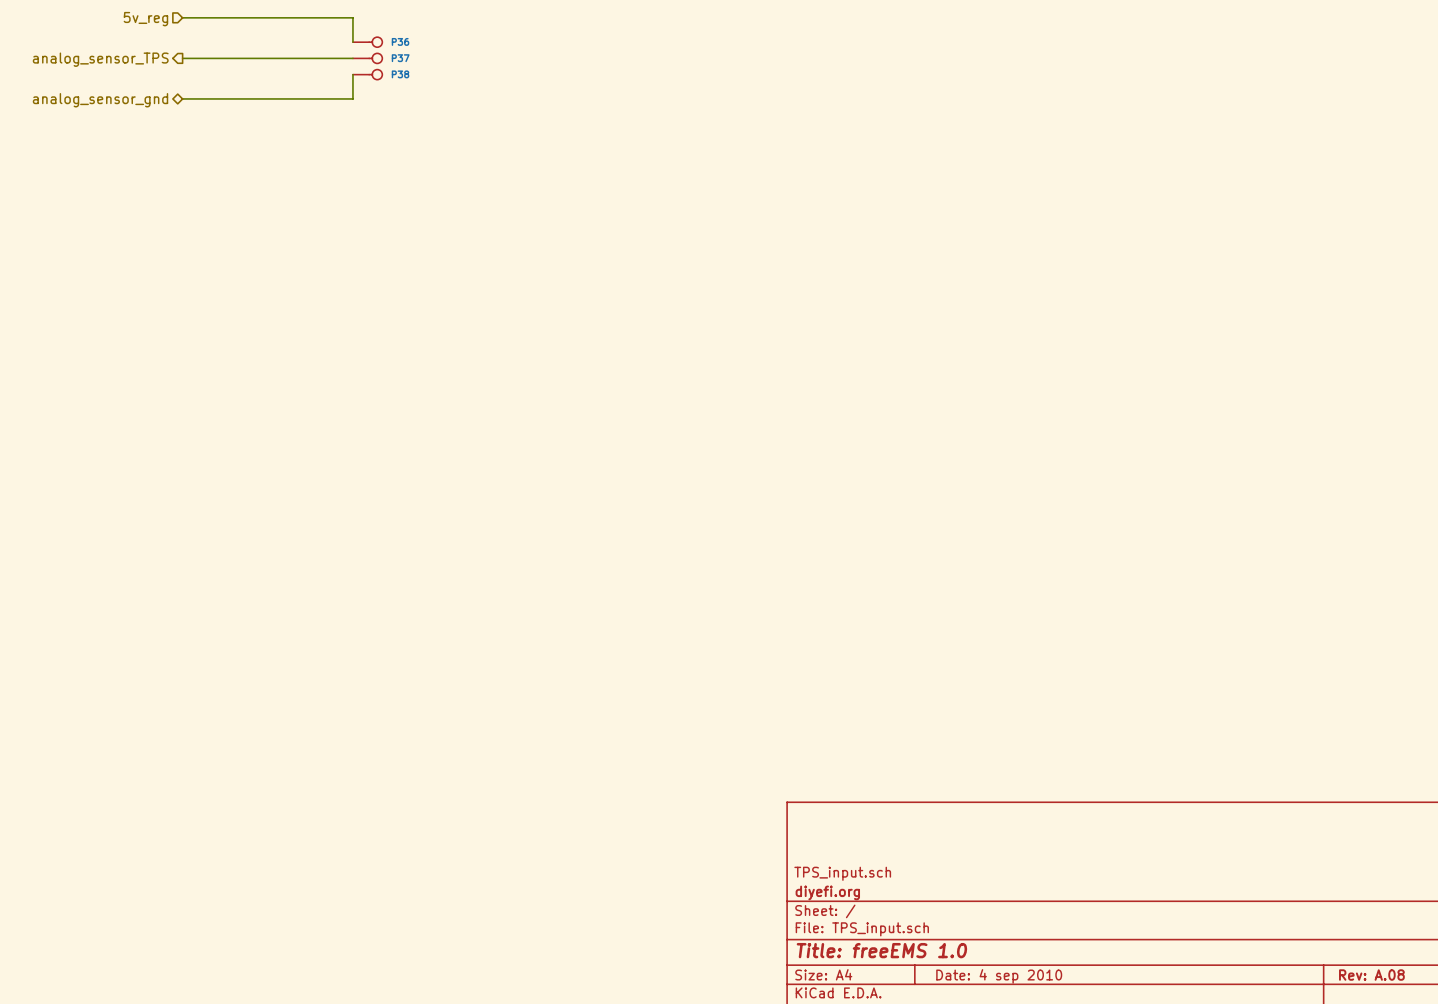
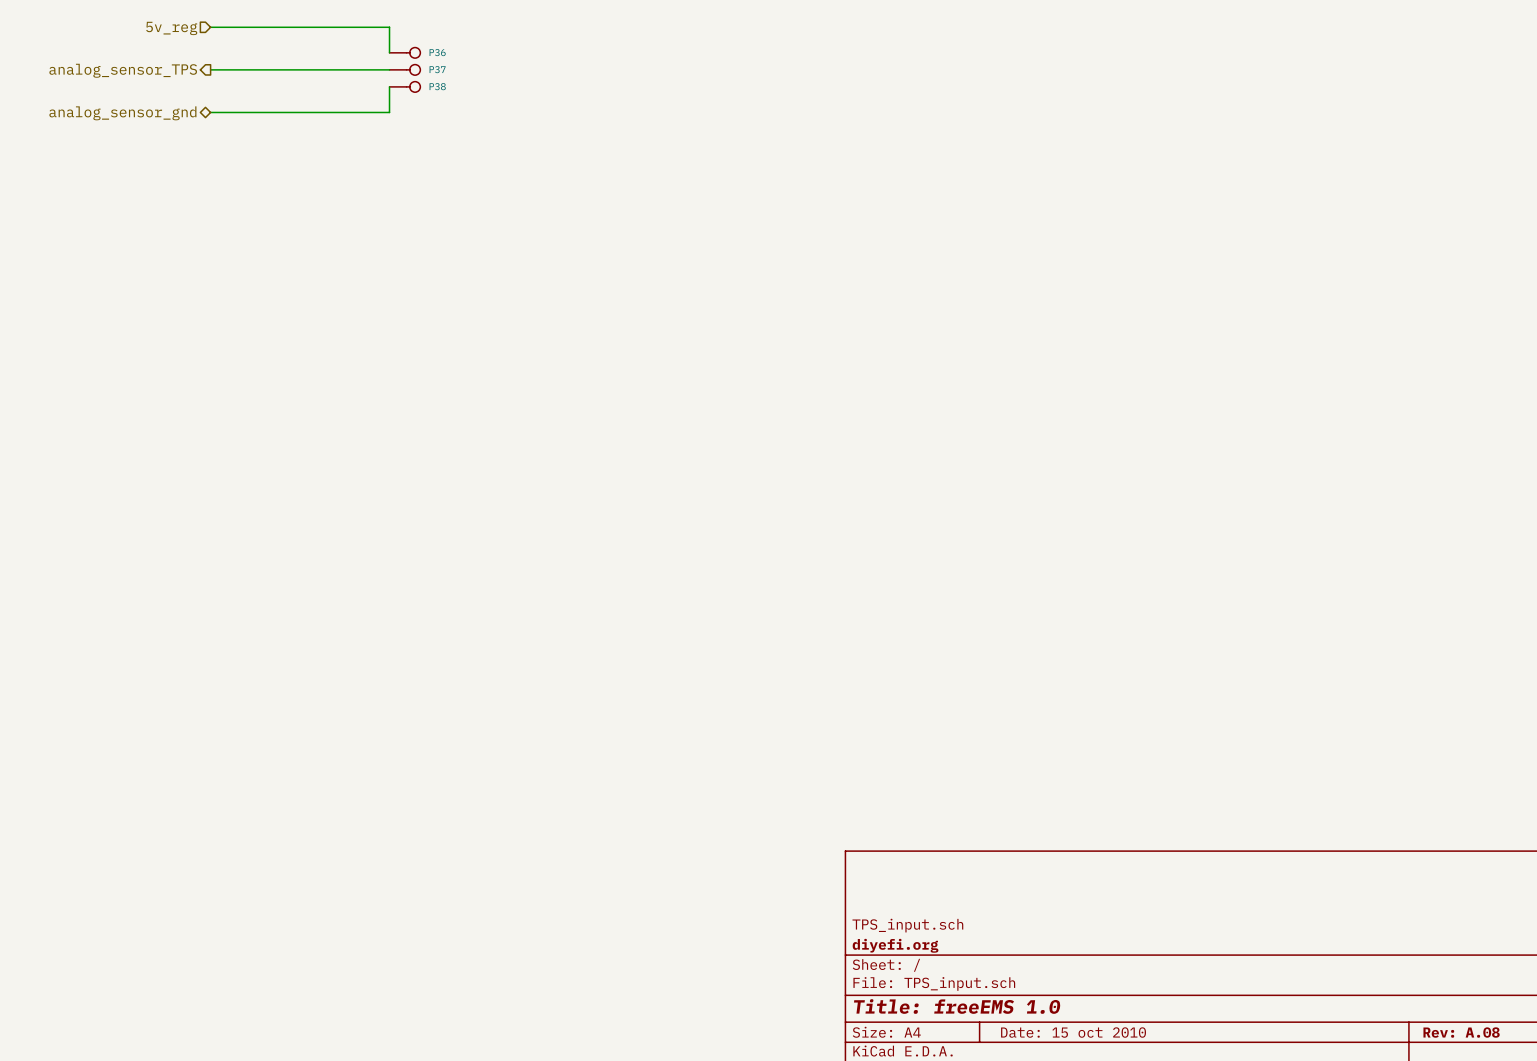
title block: Date: 4 sep 2010 (999, 976) -> Date: 15 oct 2010 (1073, 1032)

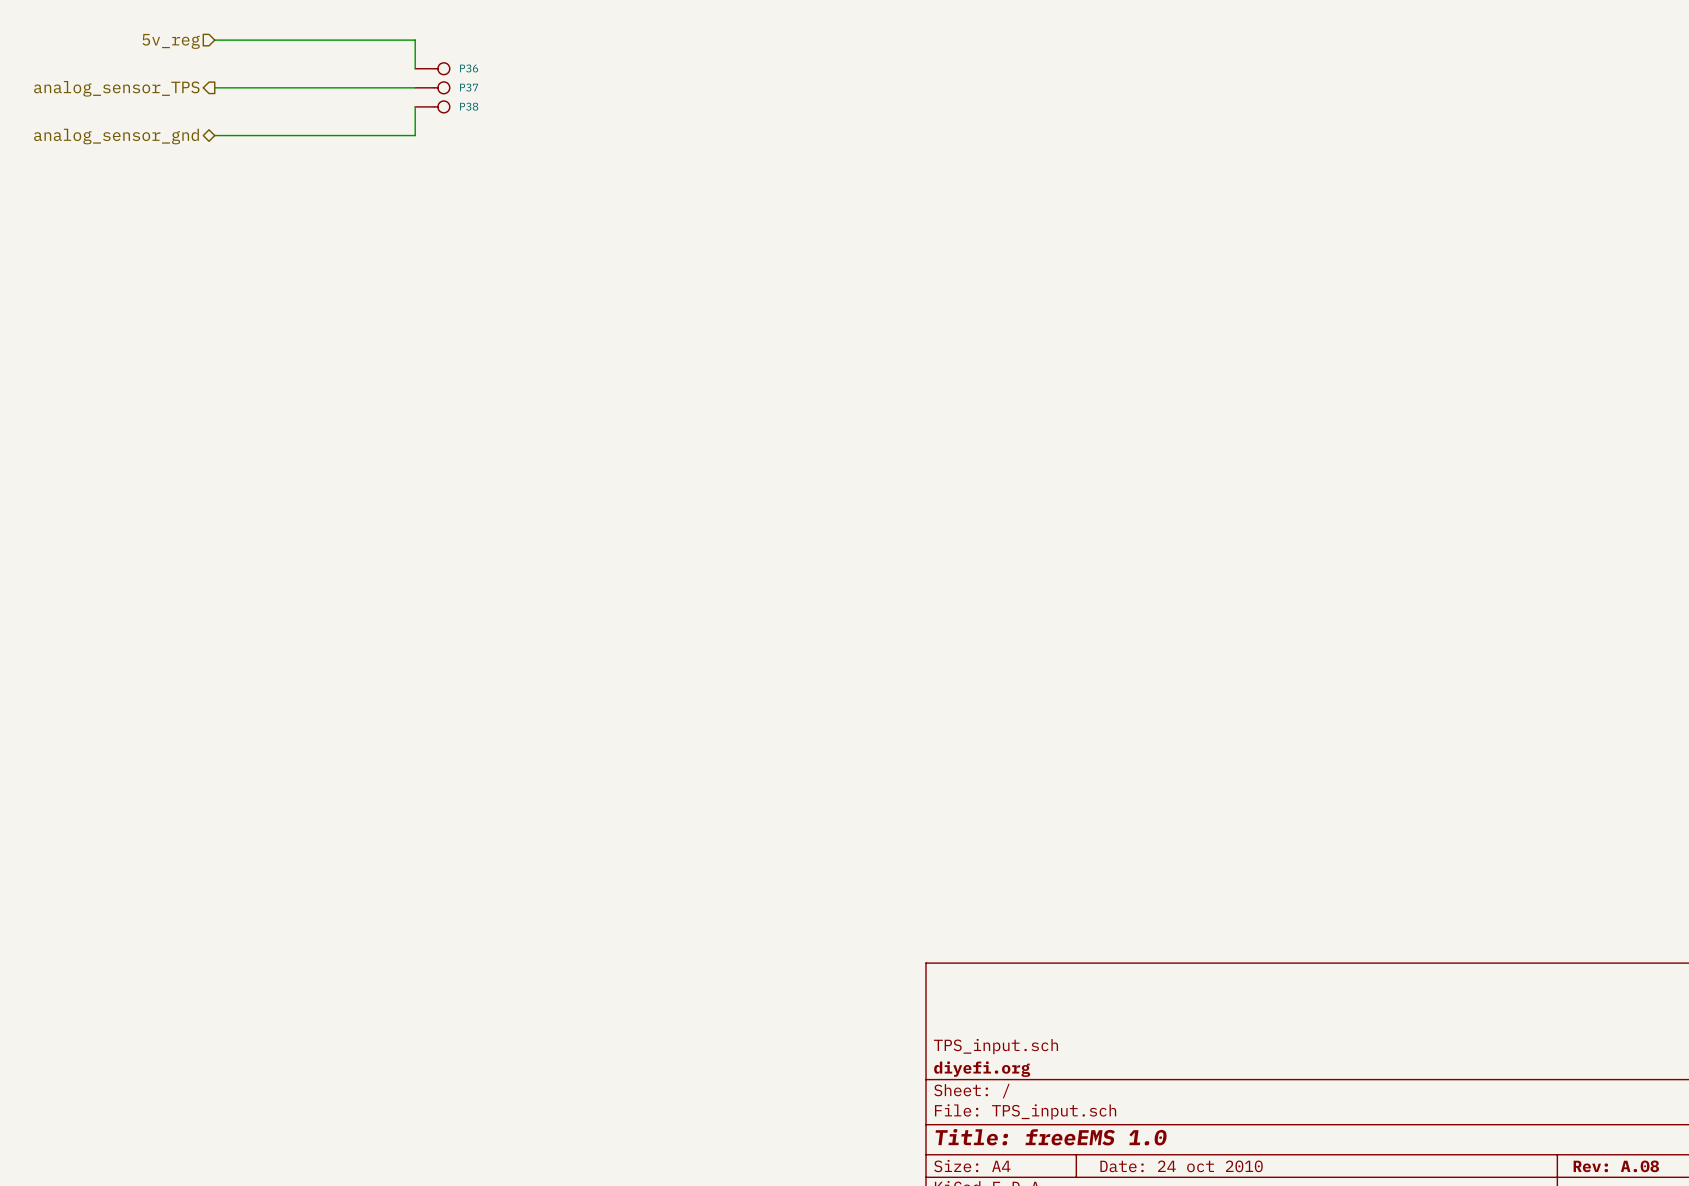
title block: Date: 15 oct 2010 (1073, 1032) -> Date: 24 oct 2010 (1181, 1166)

